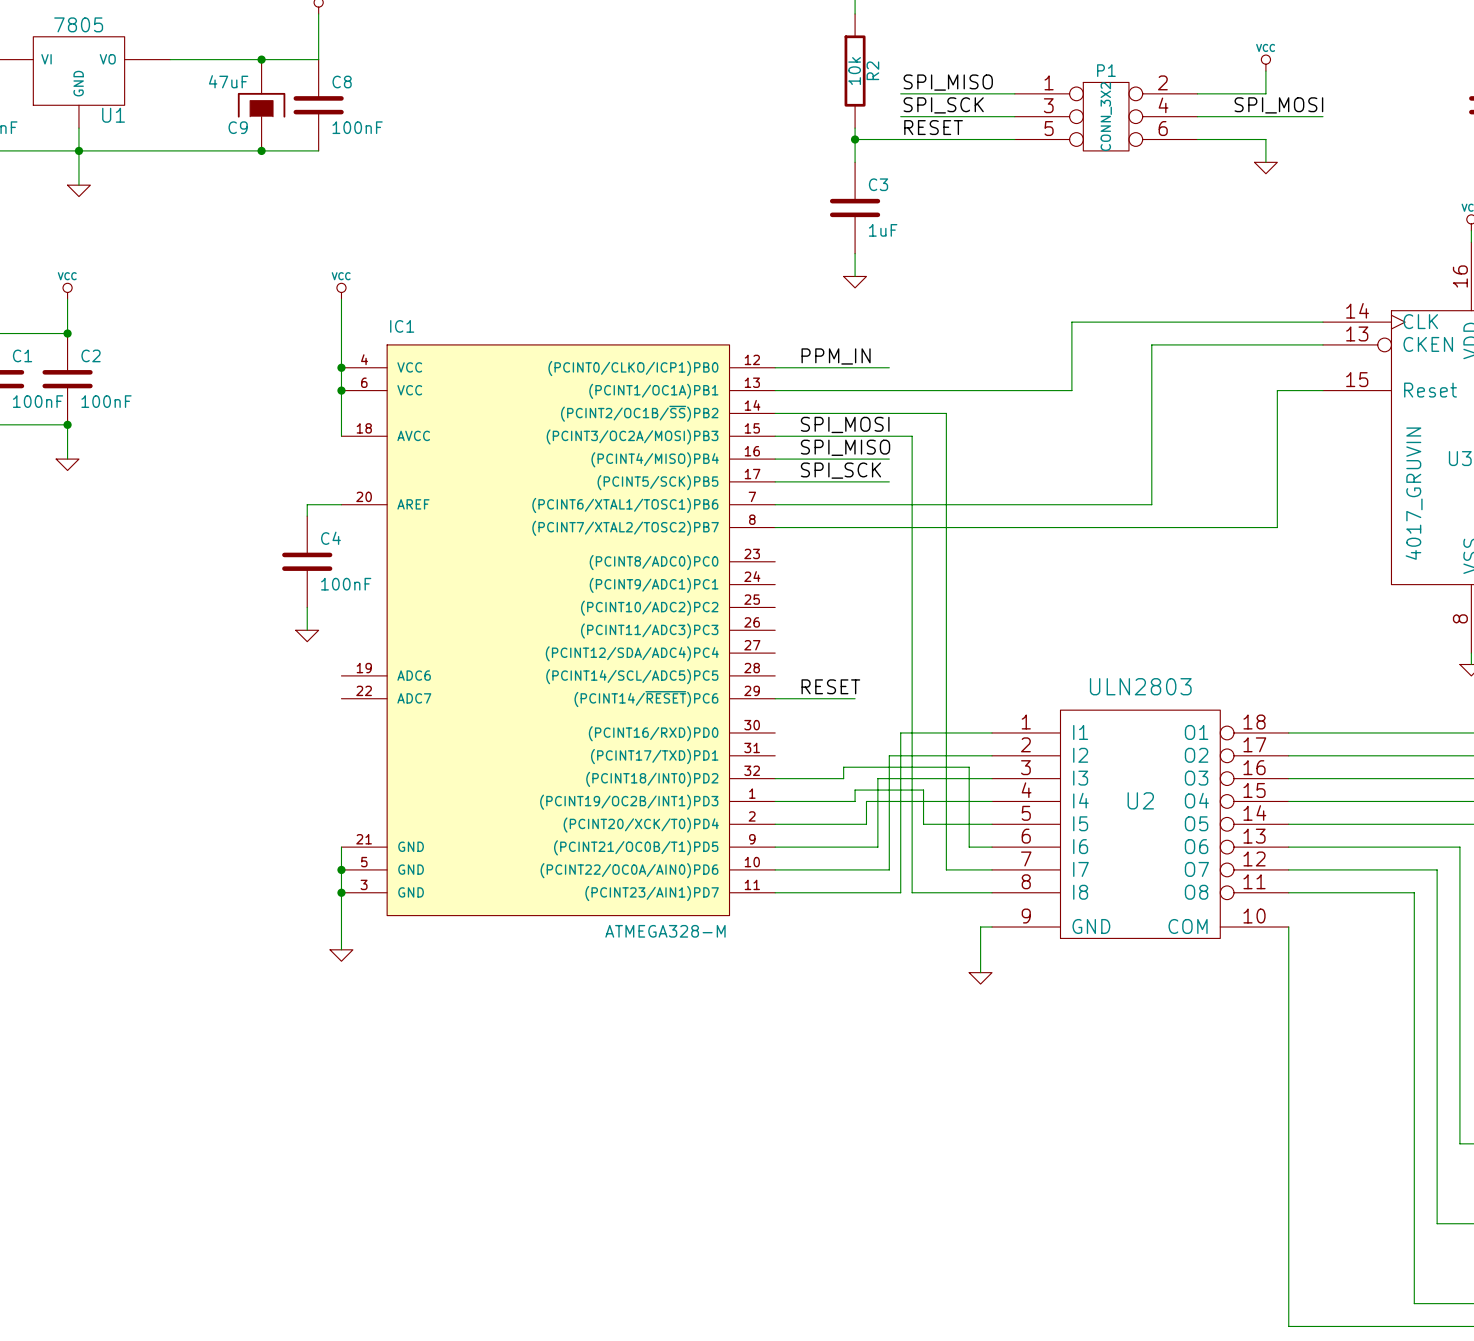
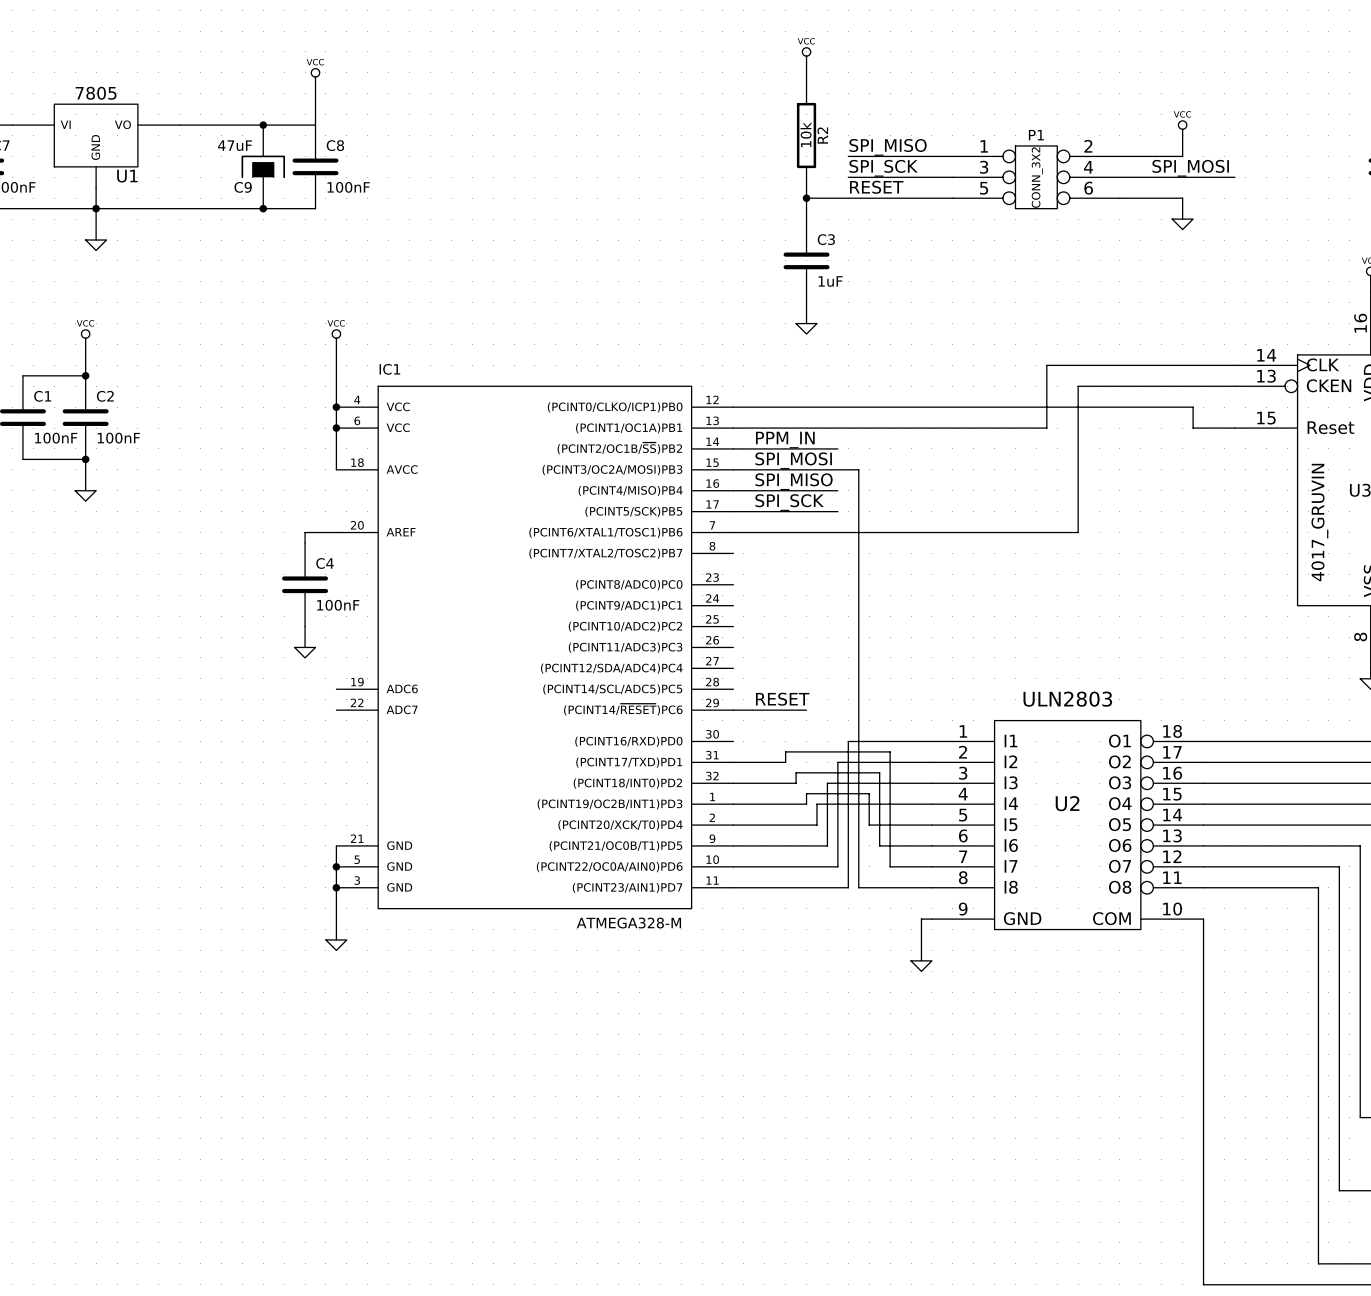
wire: (1117, 322) (1071, 322) (1071, 390) -> (1046, 365) (1046, 428) (1005, 428)
label position: PPM_IN (836, 356) -> PPM_IN (785, 440)
wire: (1277, 390) (1277, 527) (775, 527) -> (1193, 428) (1193, 407) (837, 407)
wire: (889, 413) (946, 413) (946, 744) -> (733, 762) (785, 762) (785, 751) (890, 751)
wire: (934, 767) (969, 767) (969, 847) -> (879, 772) (879, 845) (911, 845)

